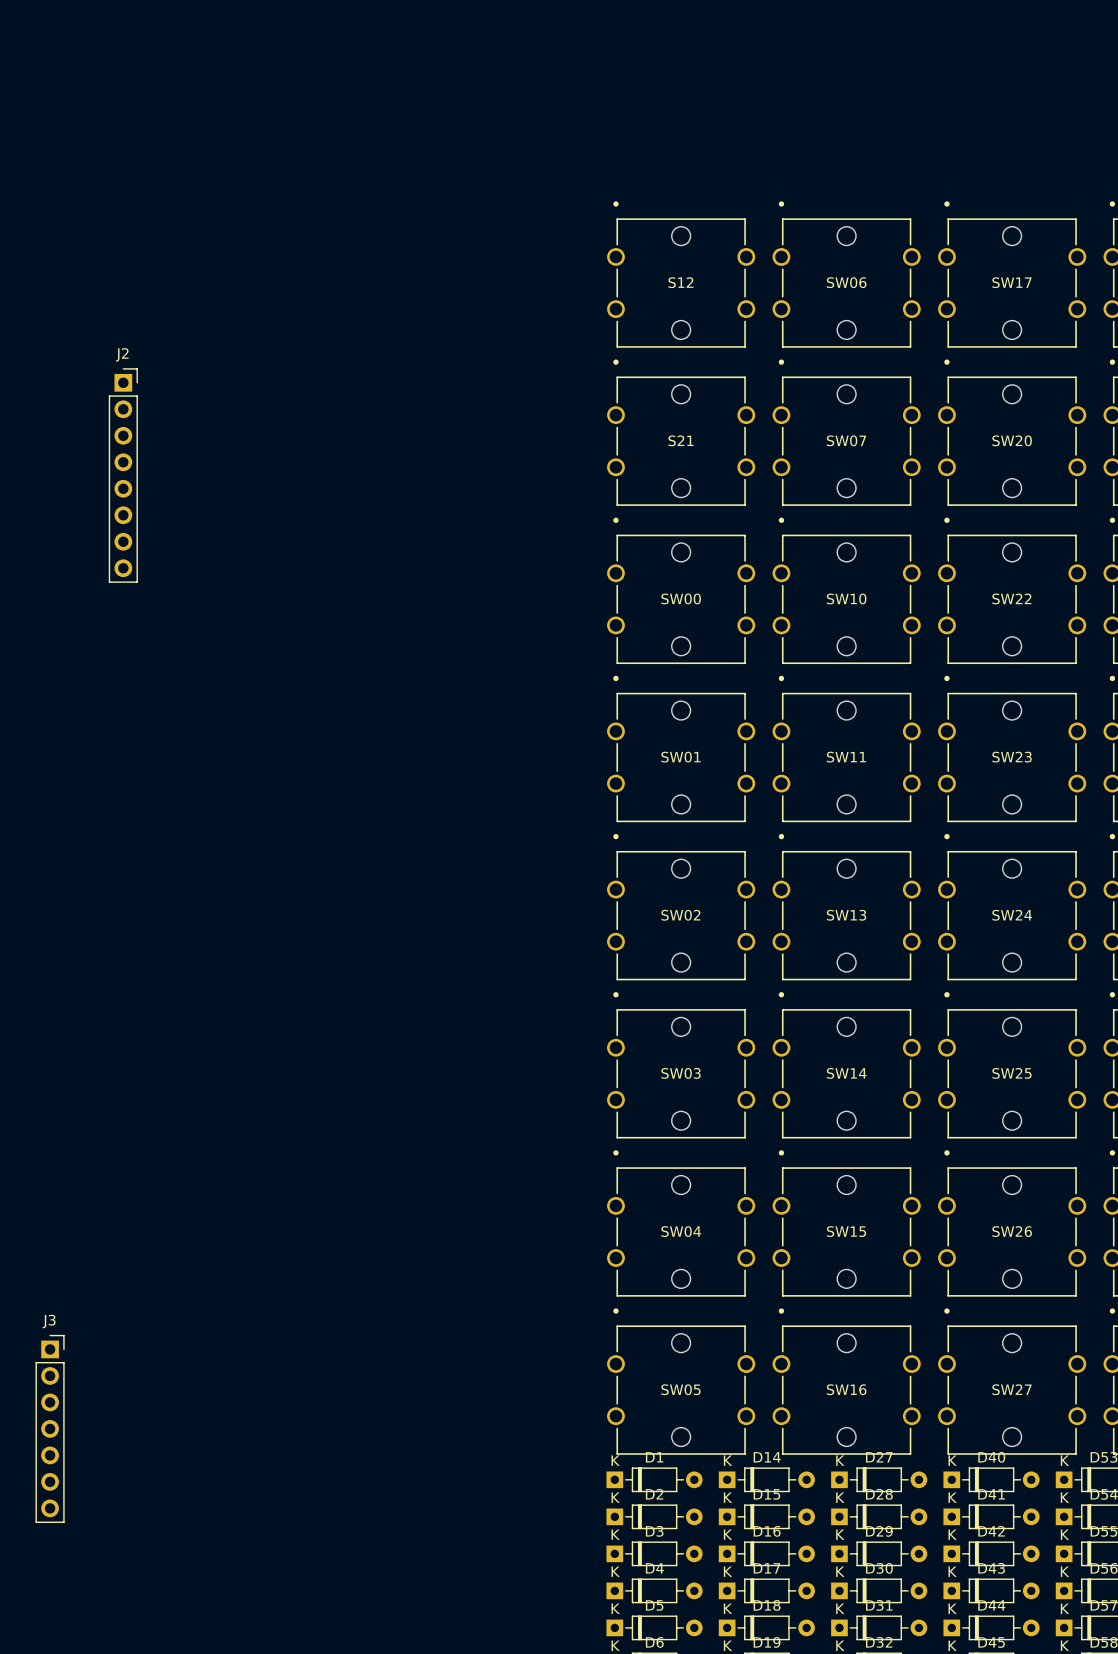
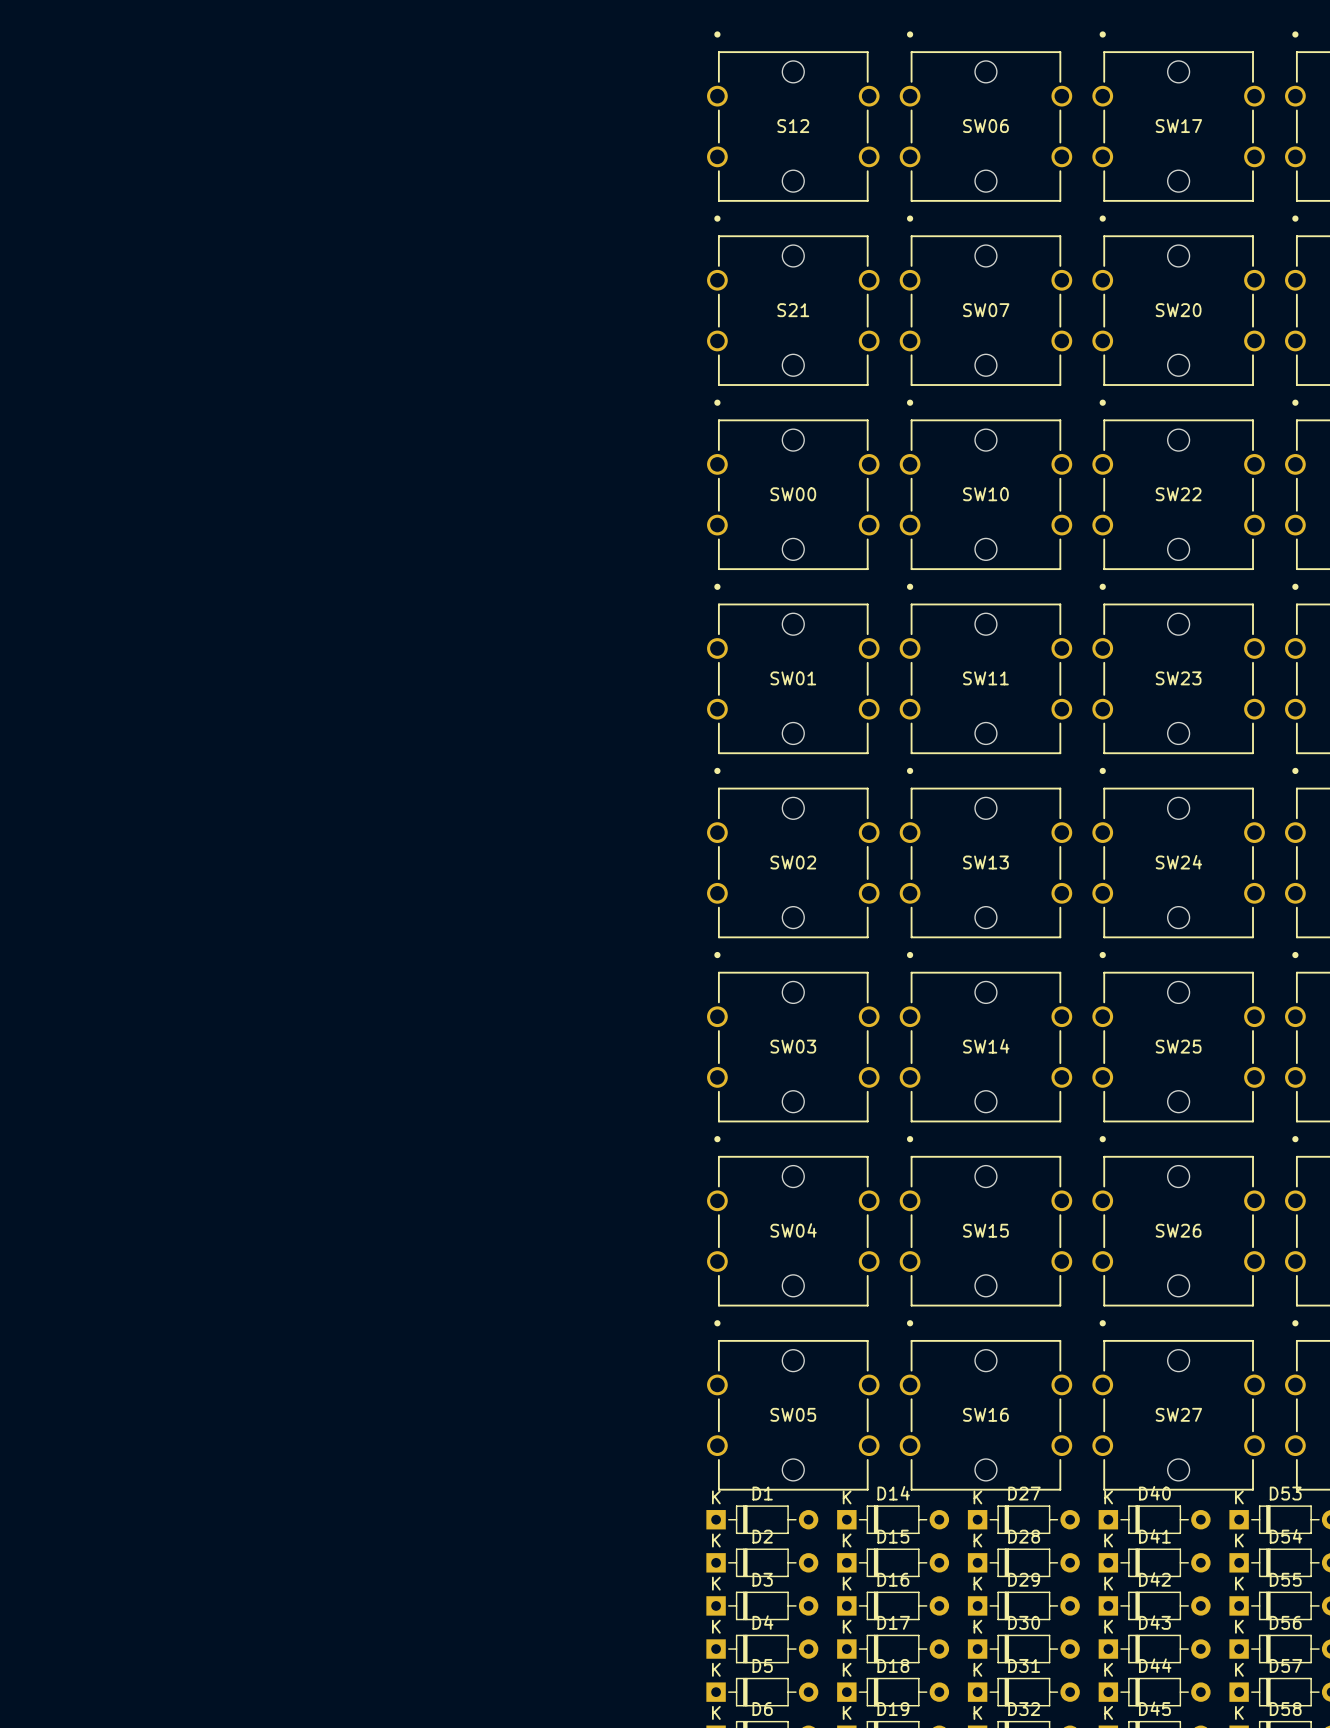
J2: (123, 475) -> none
J3: (50, 1428) -> none

